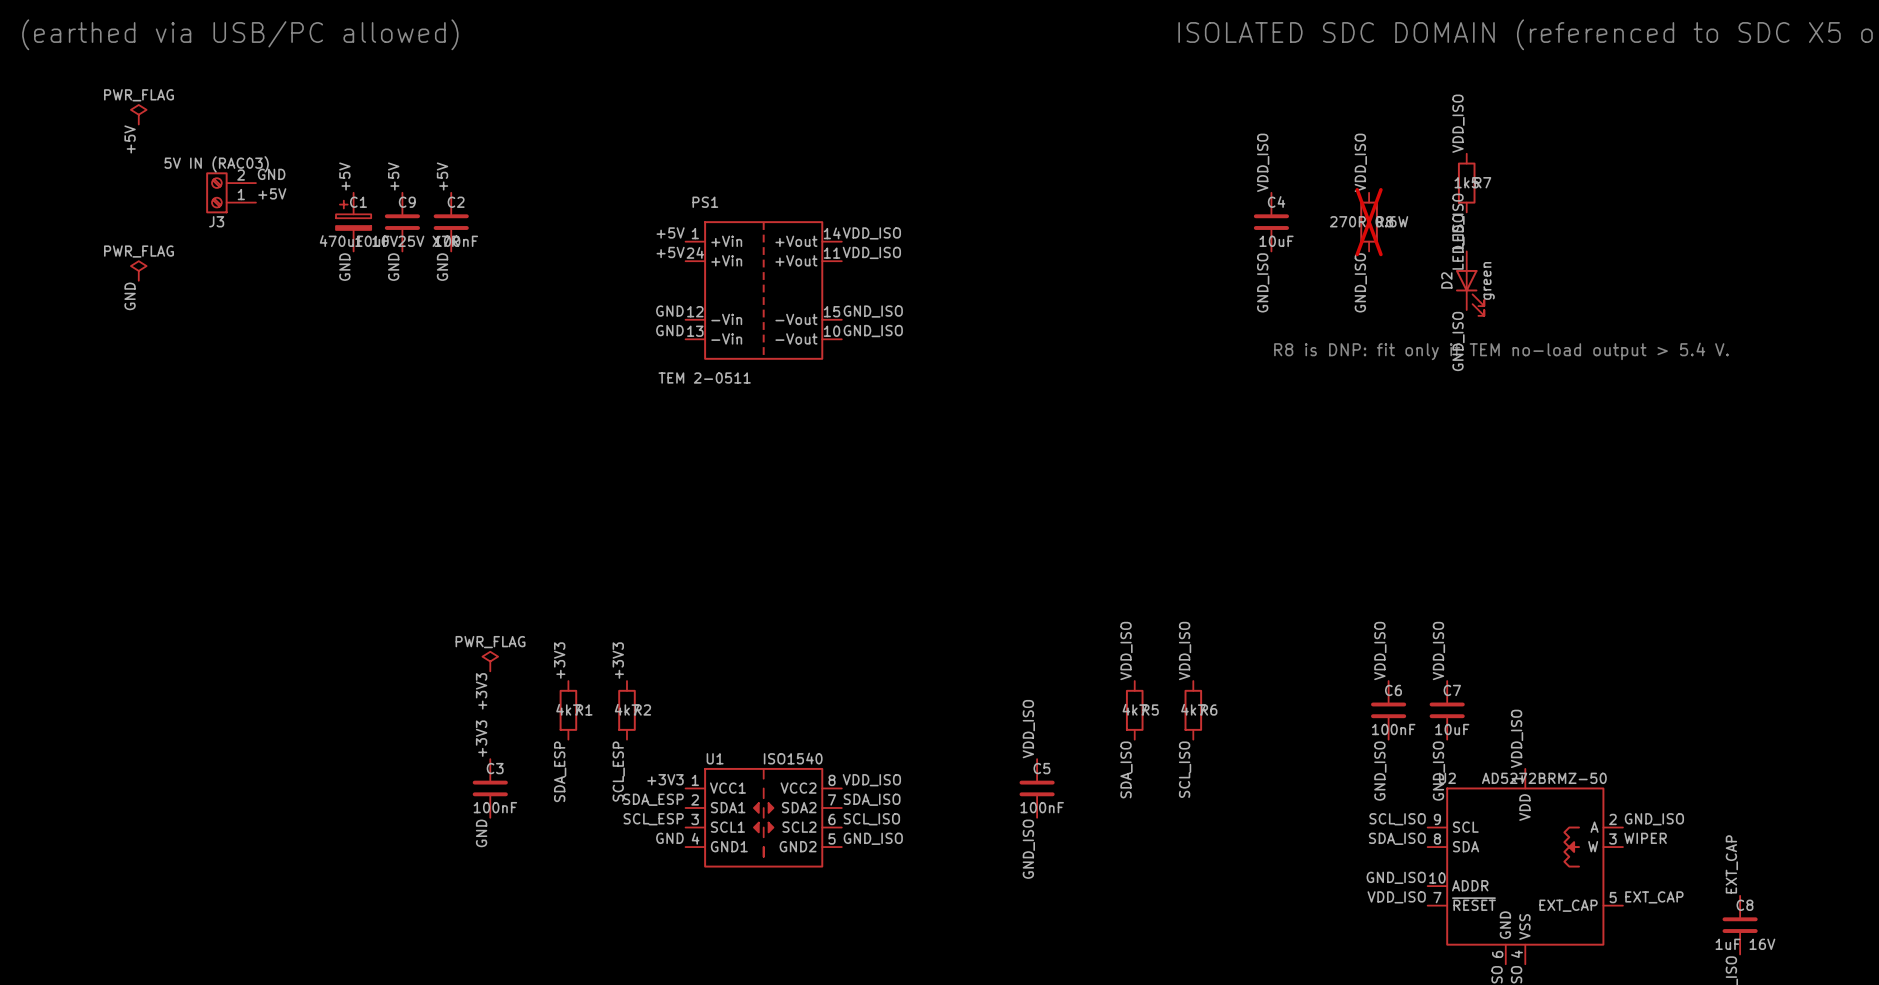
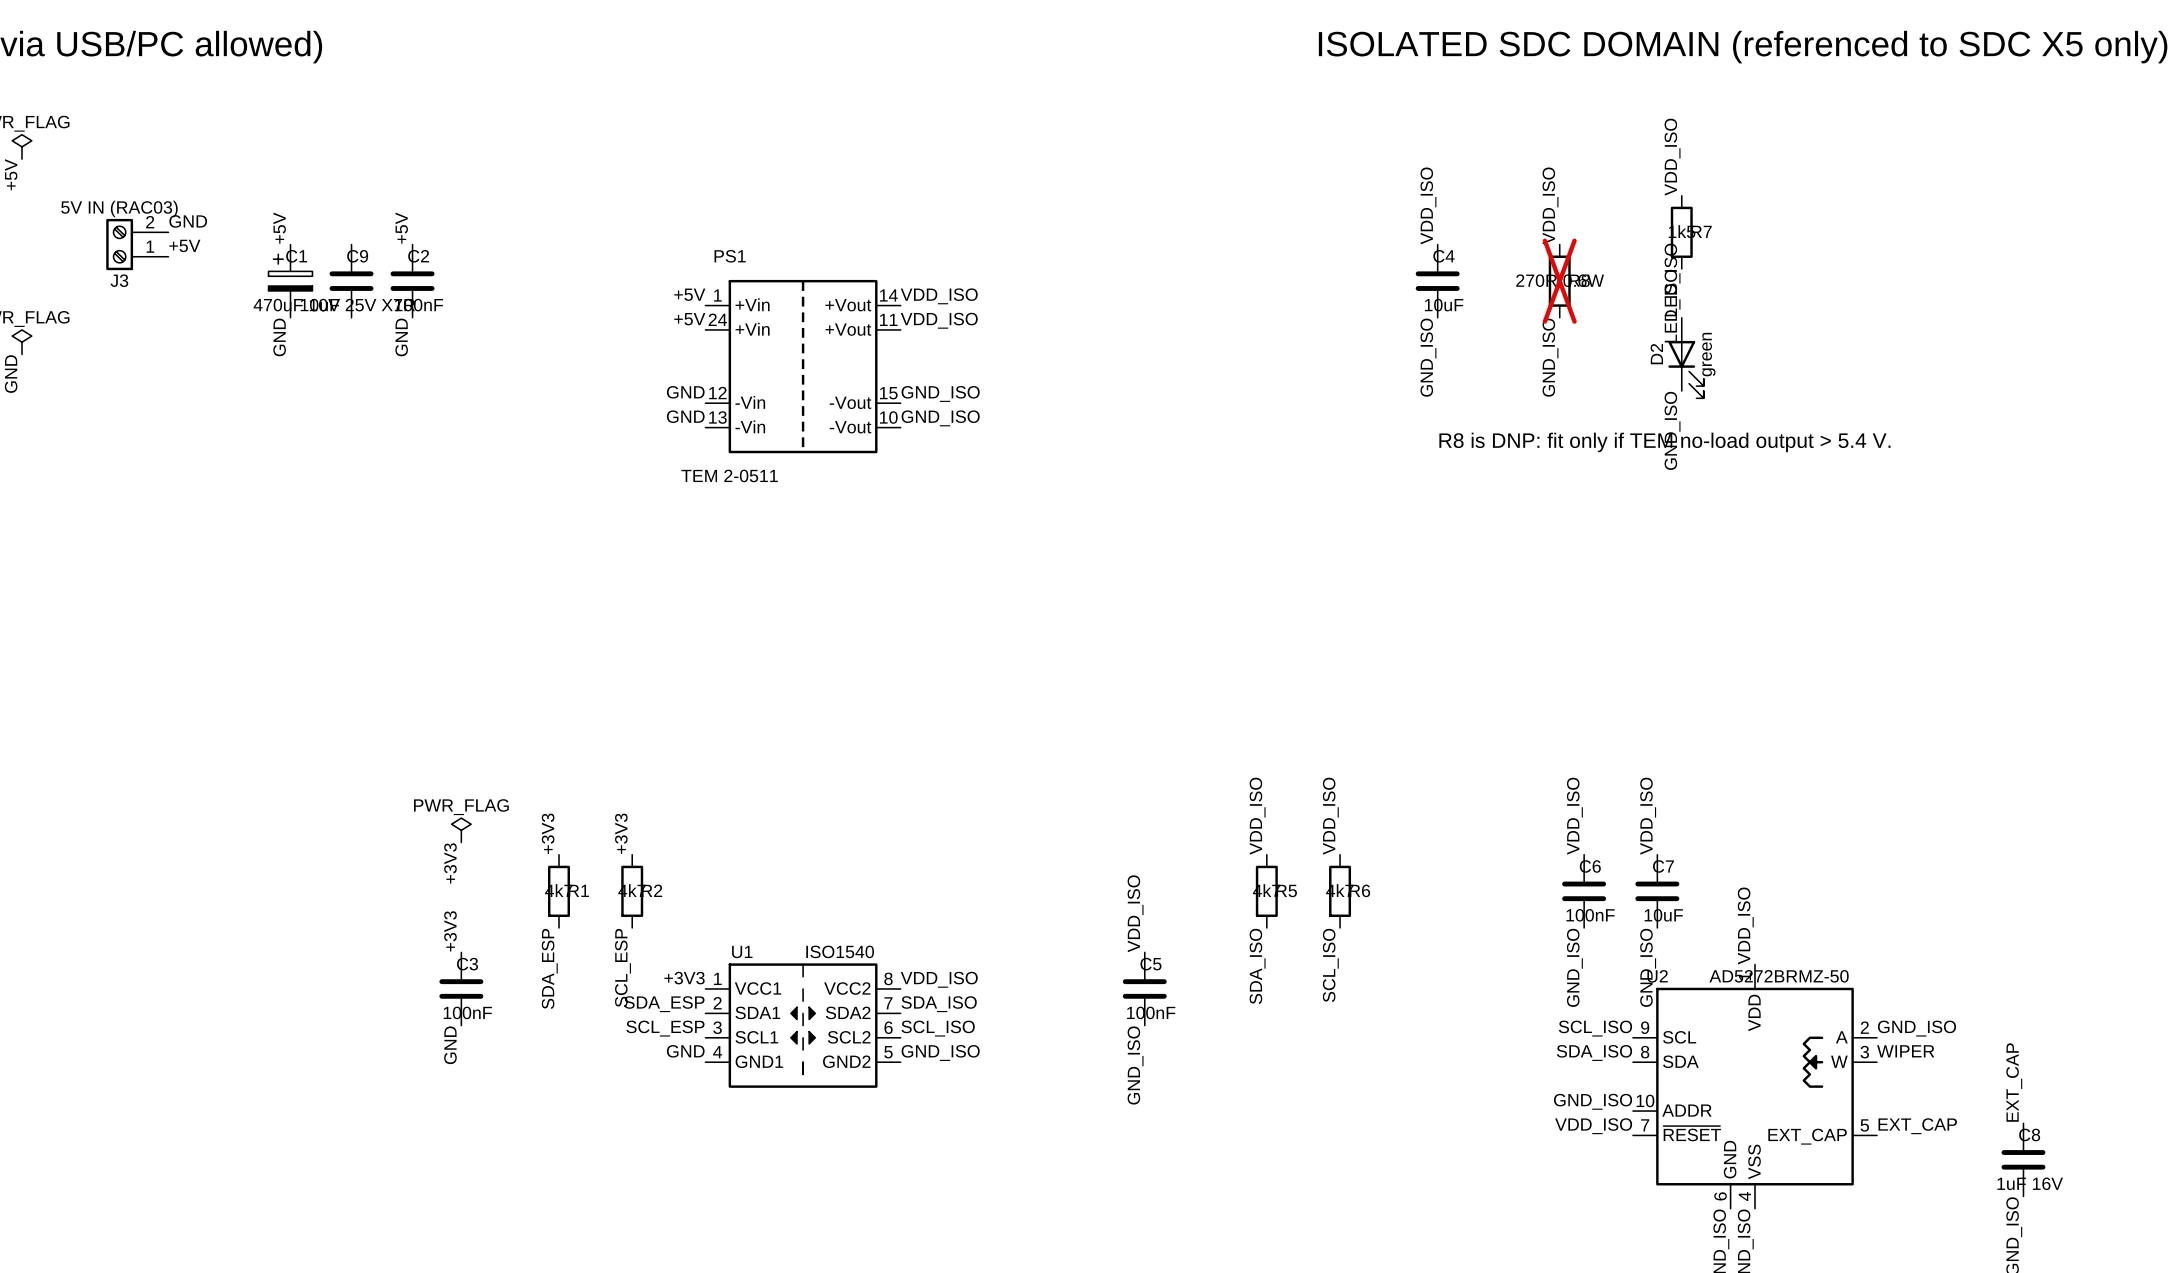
label: +5V (393, 176) -> none
label: GND (393, 267) -> none

